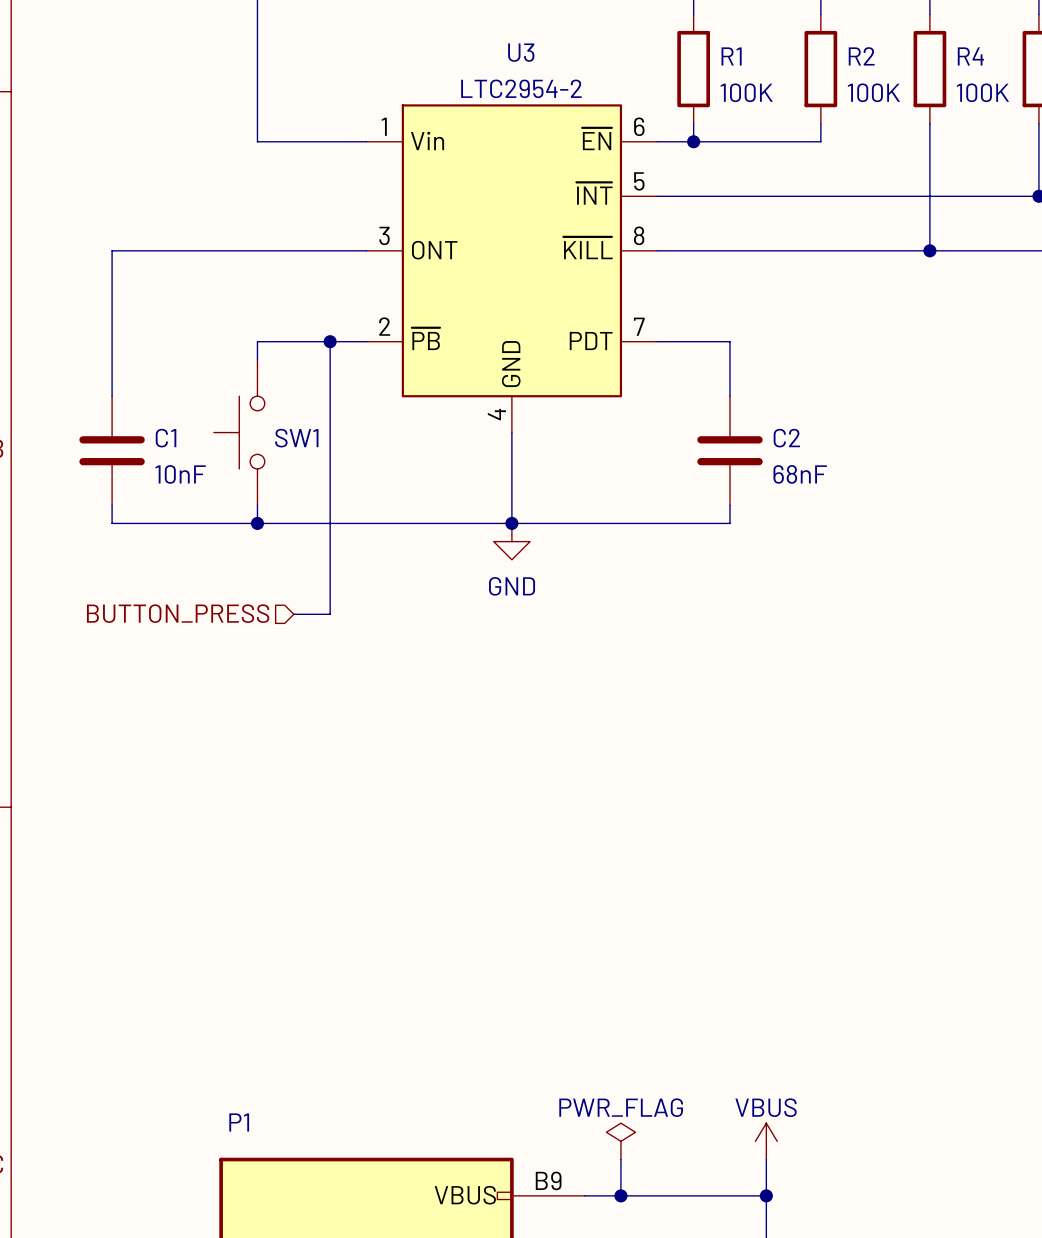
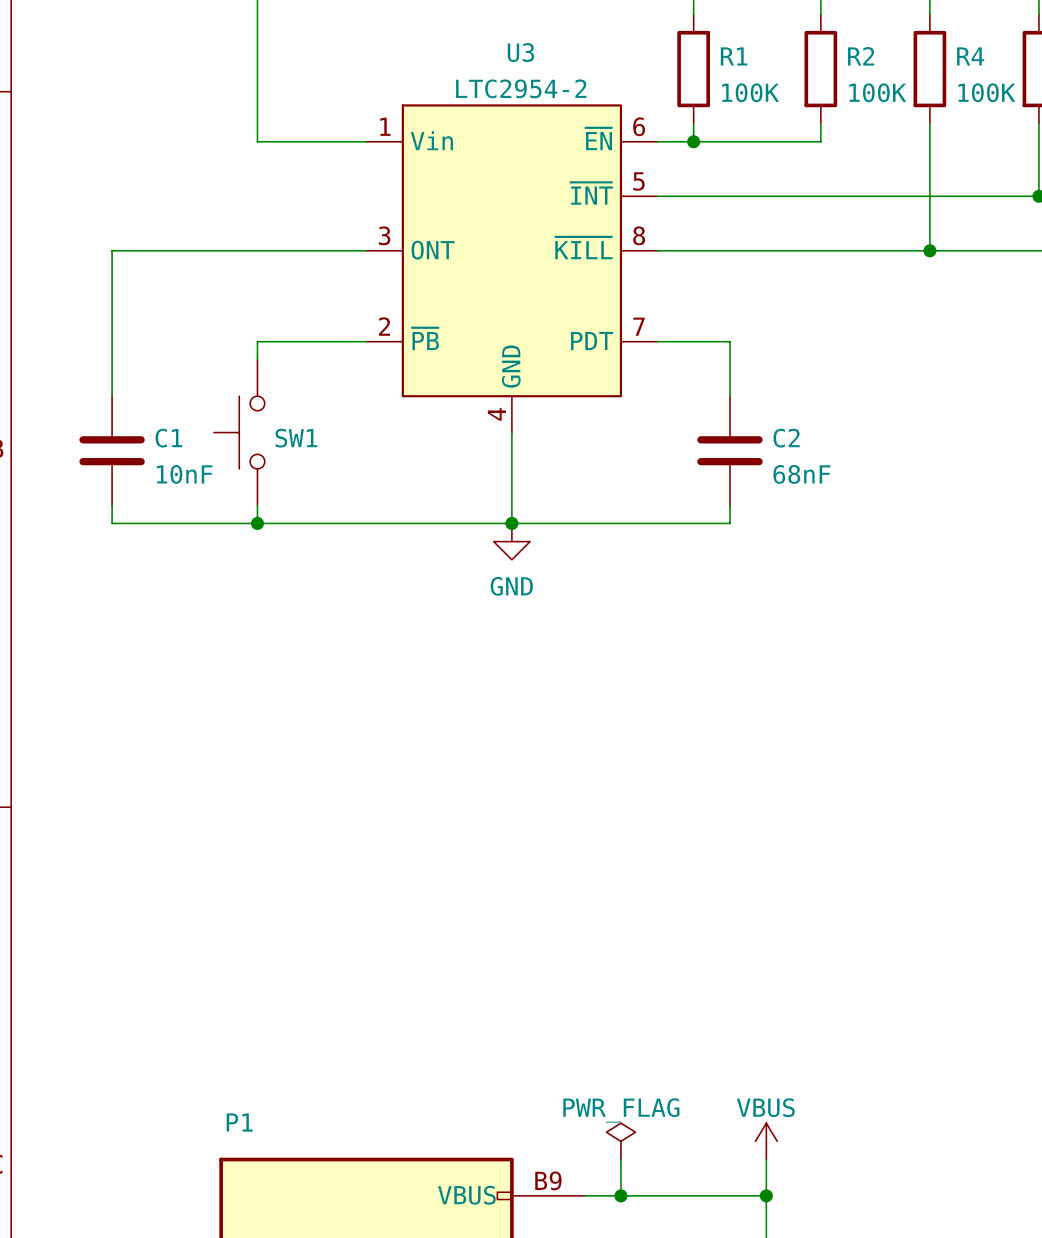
wire: (330, 341) (330, 614) (293, 614) -> none
junction: (330, 341) -> none
hierarchical label: BUTTON_PRESS (178, 613) -> none

